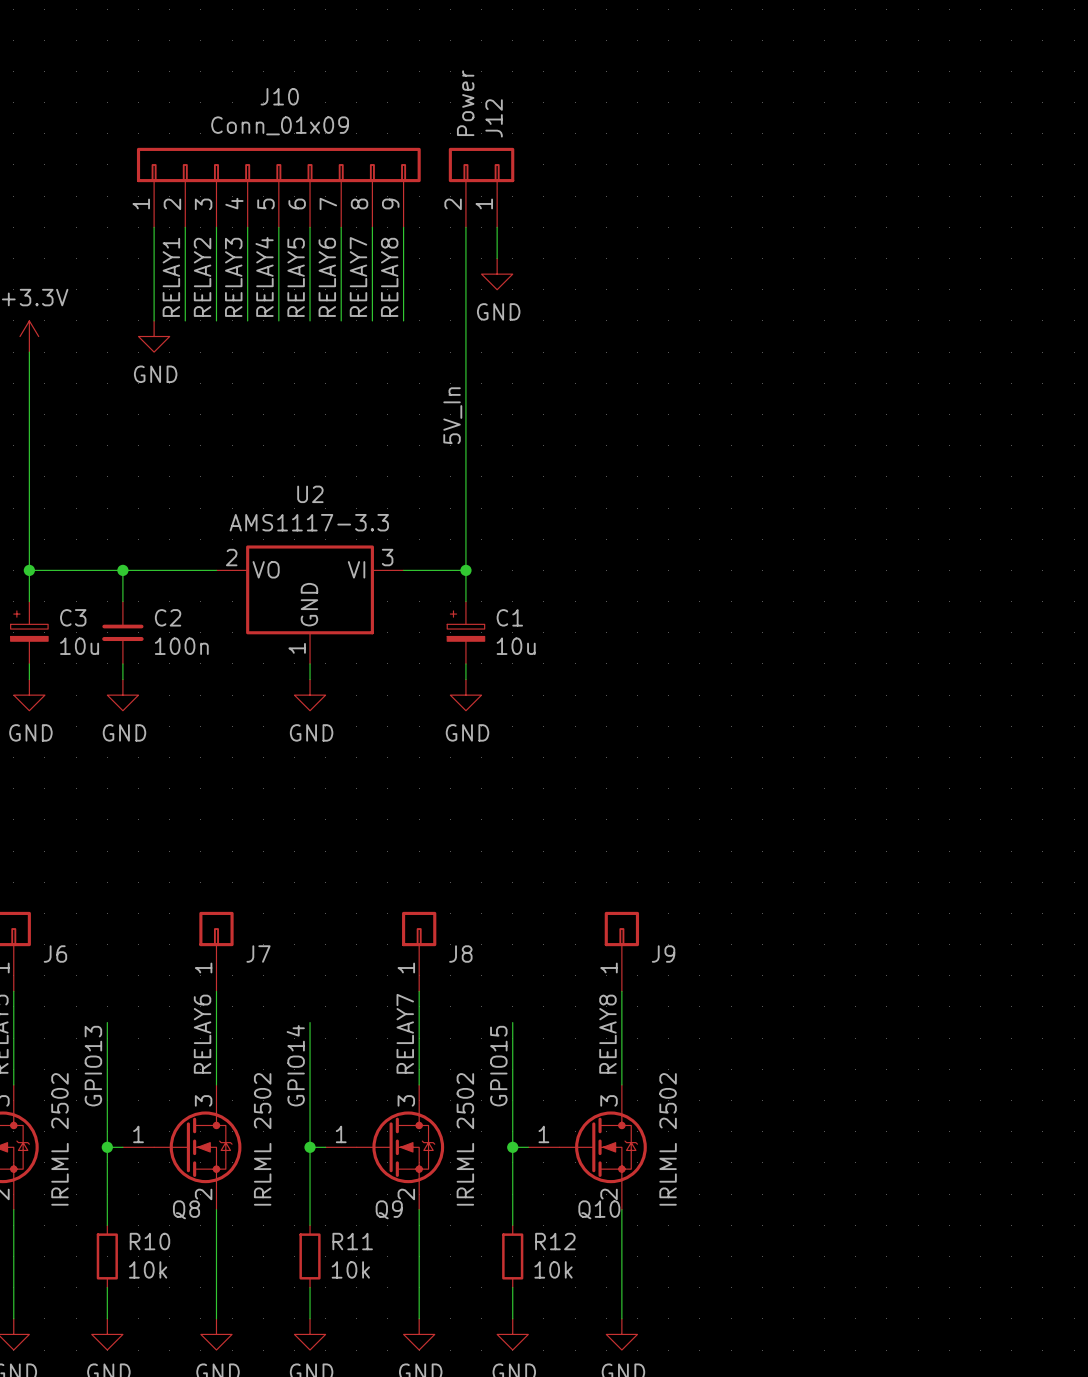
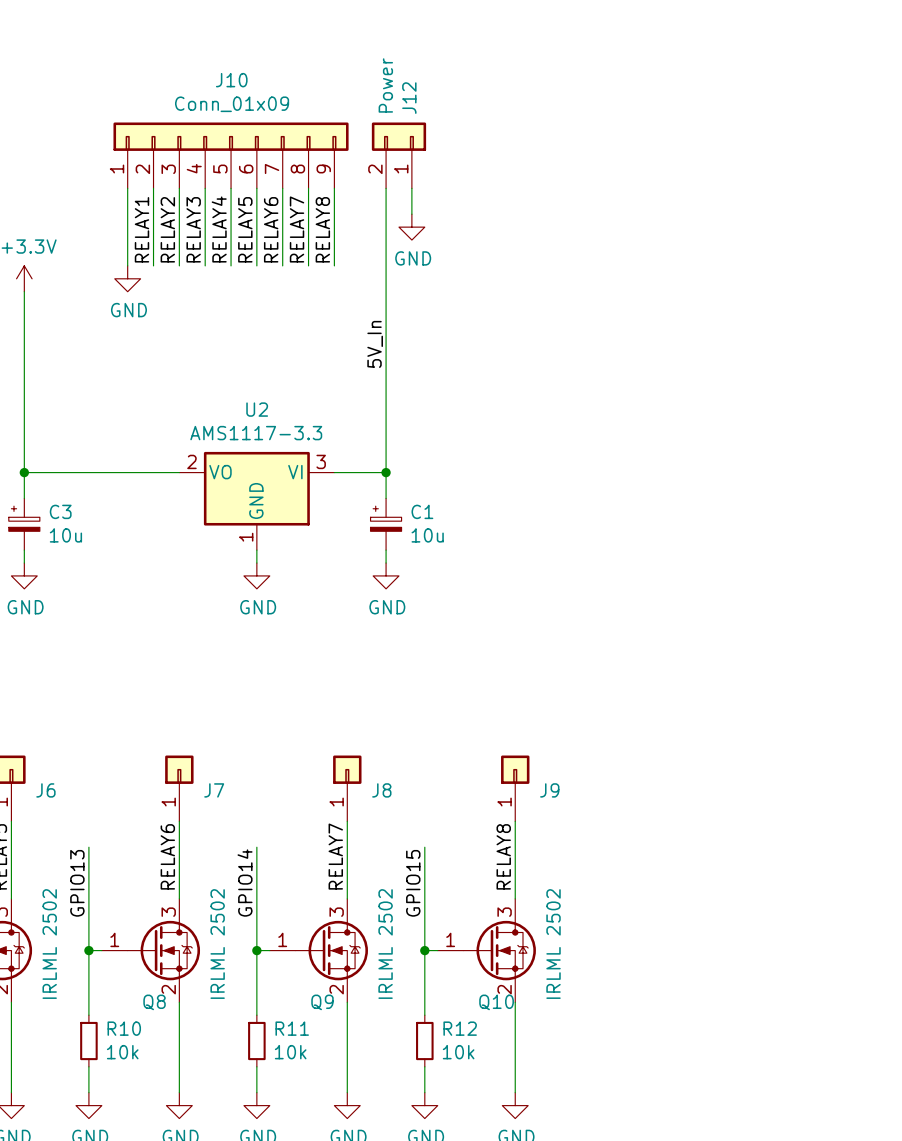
wire: (122, 570) (122, 601) -> none
junction: (122, 570) -> none
C2: 100n (122, 632) -> none
wire: (122, 663) (122, 679) -> none
power symbol: GND (122, 695) -> none

